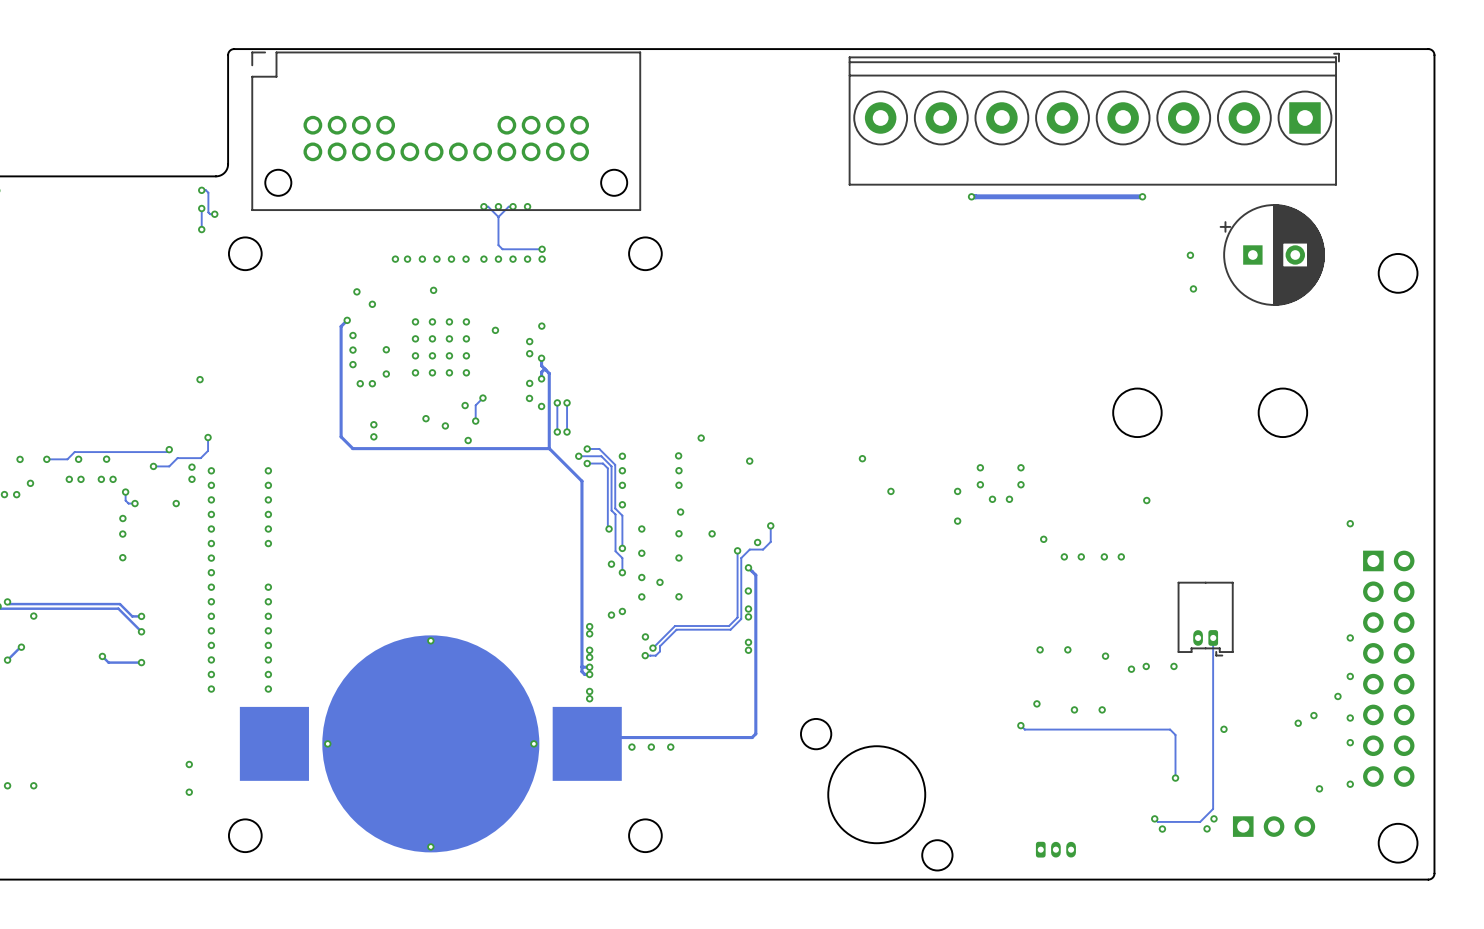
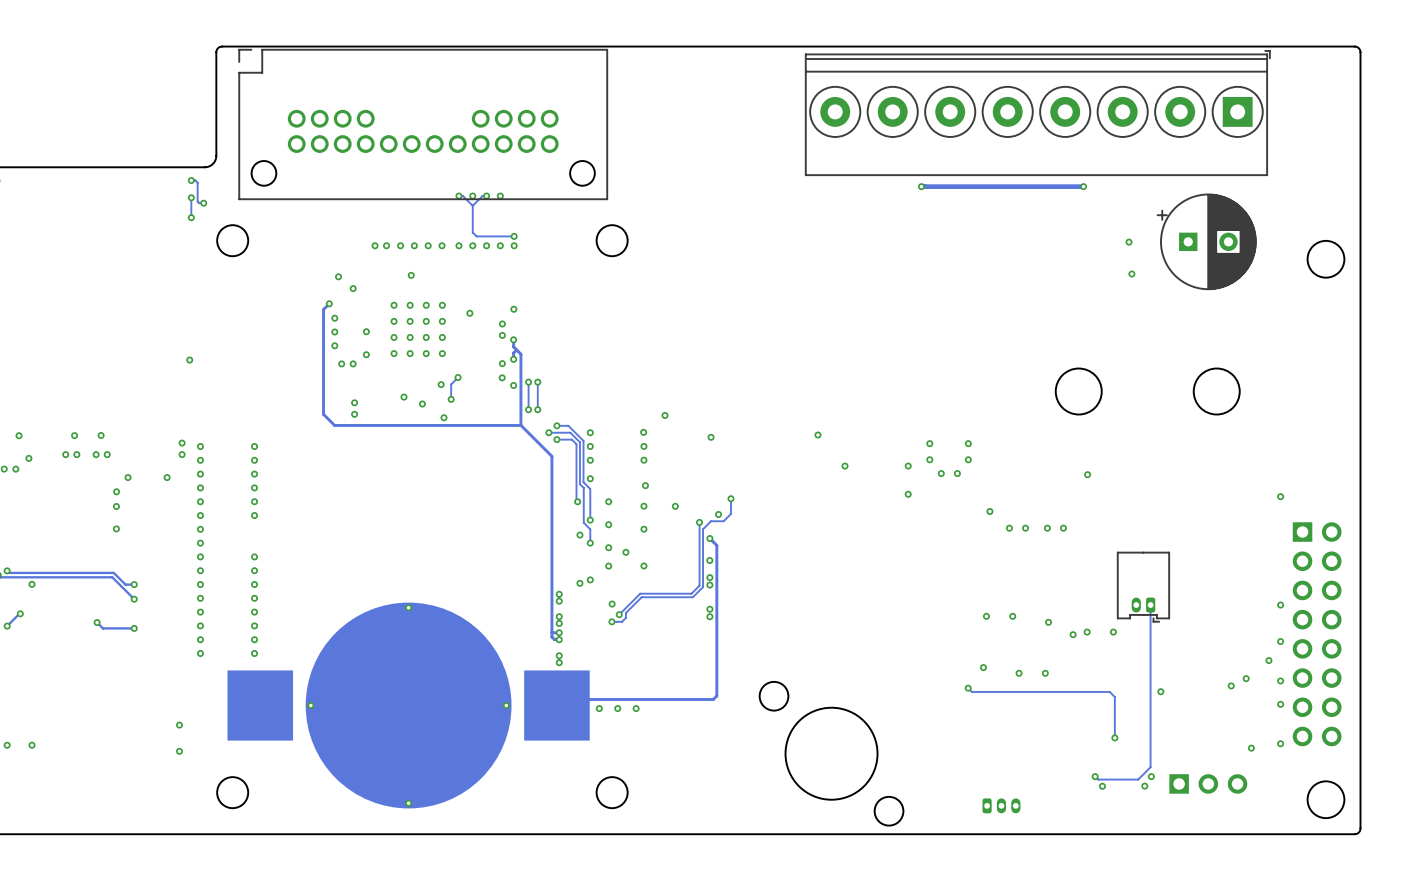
track: (208, 437) (208, 450) (200, 458) (177, 458) (169, 466) (153, 466) -> none
via: (208, 437) -> none
track: (169, 449) (166, 452) (74, 452) (67, 459) (46, 459) -> none
via: (169, 449) -> none
via: (46, 459) -> none
via: (153, 466) -> none
track: (125, 492) (125, 500) (128, 503) (134, 503) -> none
via: (125, 492) -> none

